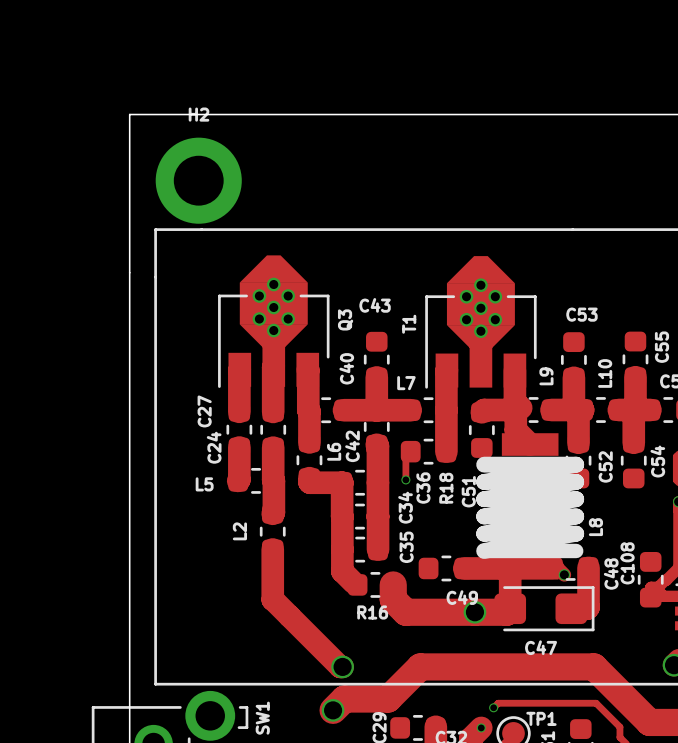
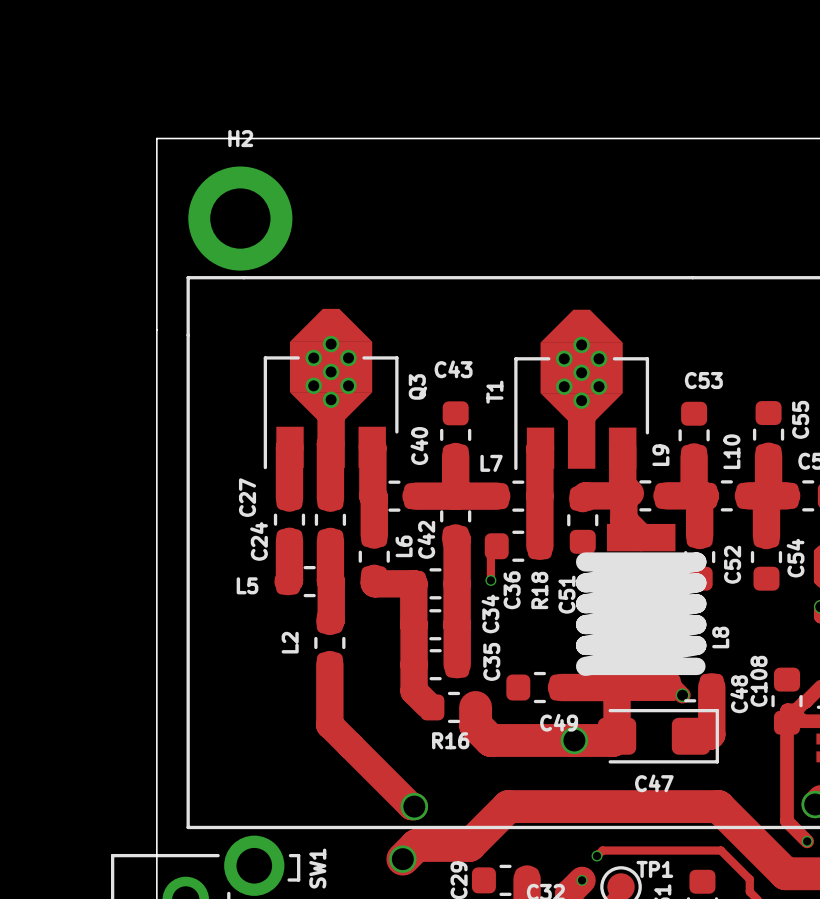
track: none -> (787, 722) (787, 821) (807, 841)
via: none -> (807, 841)

